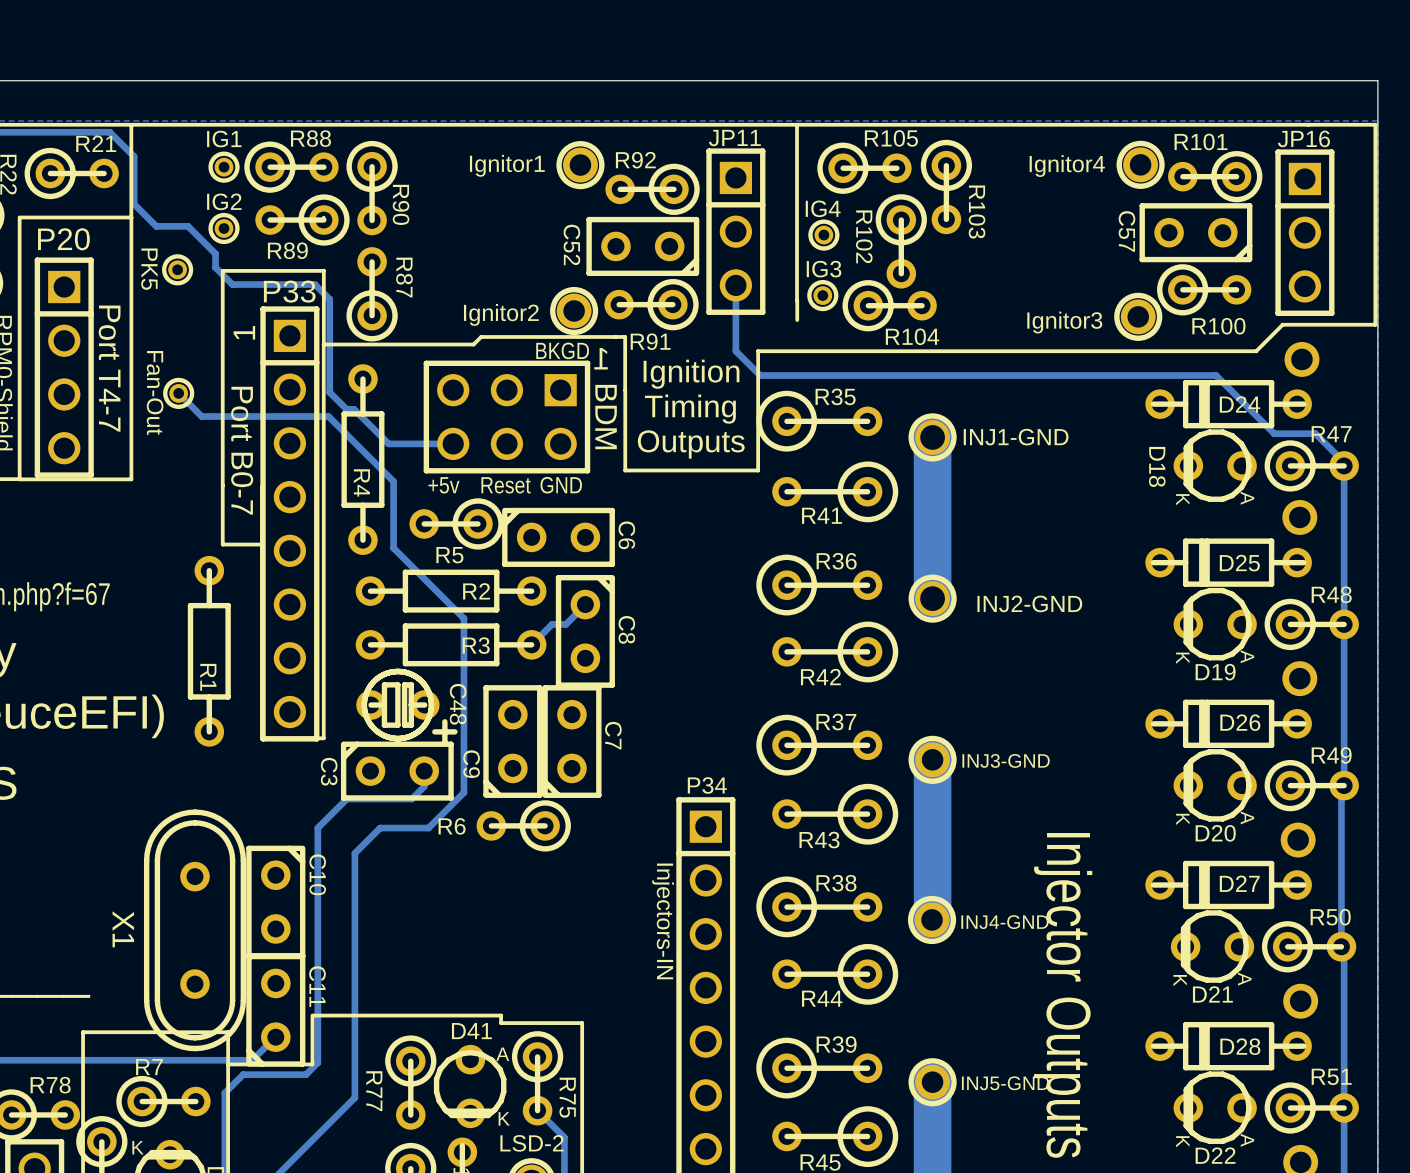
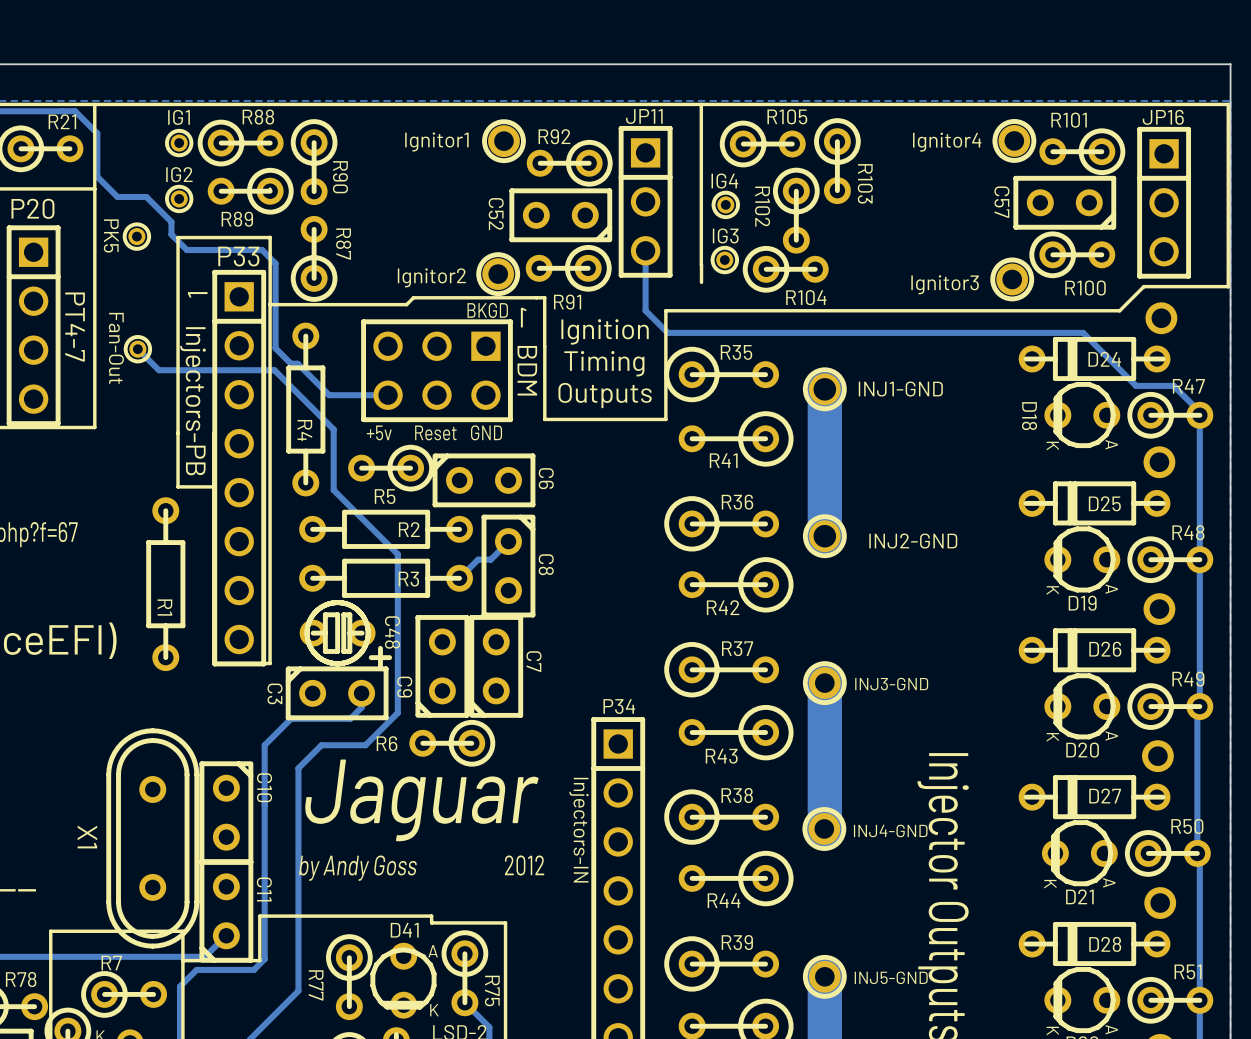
P20 value: Port T4-7 (109, 368) -> PT4-7 (75, 327)
P33 value: Port B0-7 (242, 450) -> Injectors-PB (192, 401)
text: none -> Jaguar (421, 800)
text: none -> 2012 (524, 865)
text: none -> by Andy Goss (357, 868)

